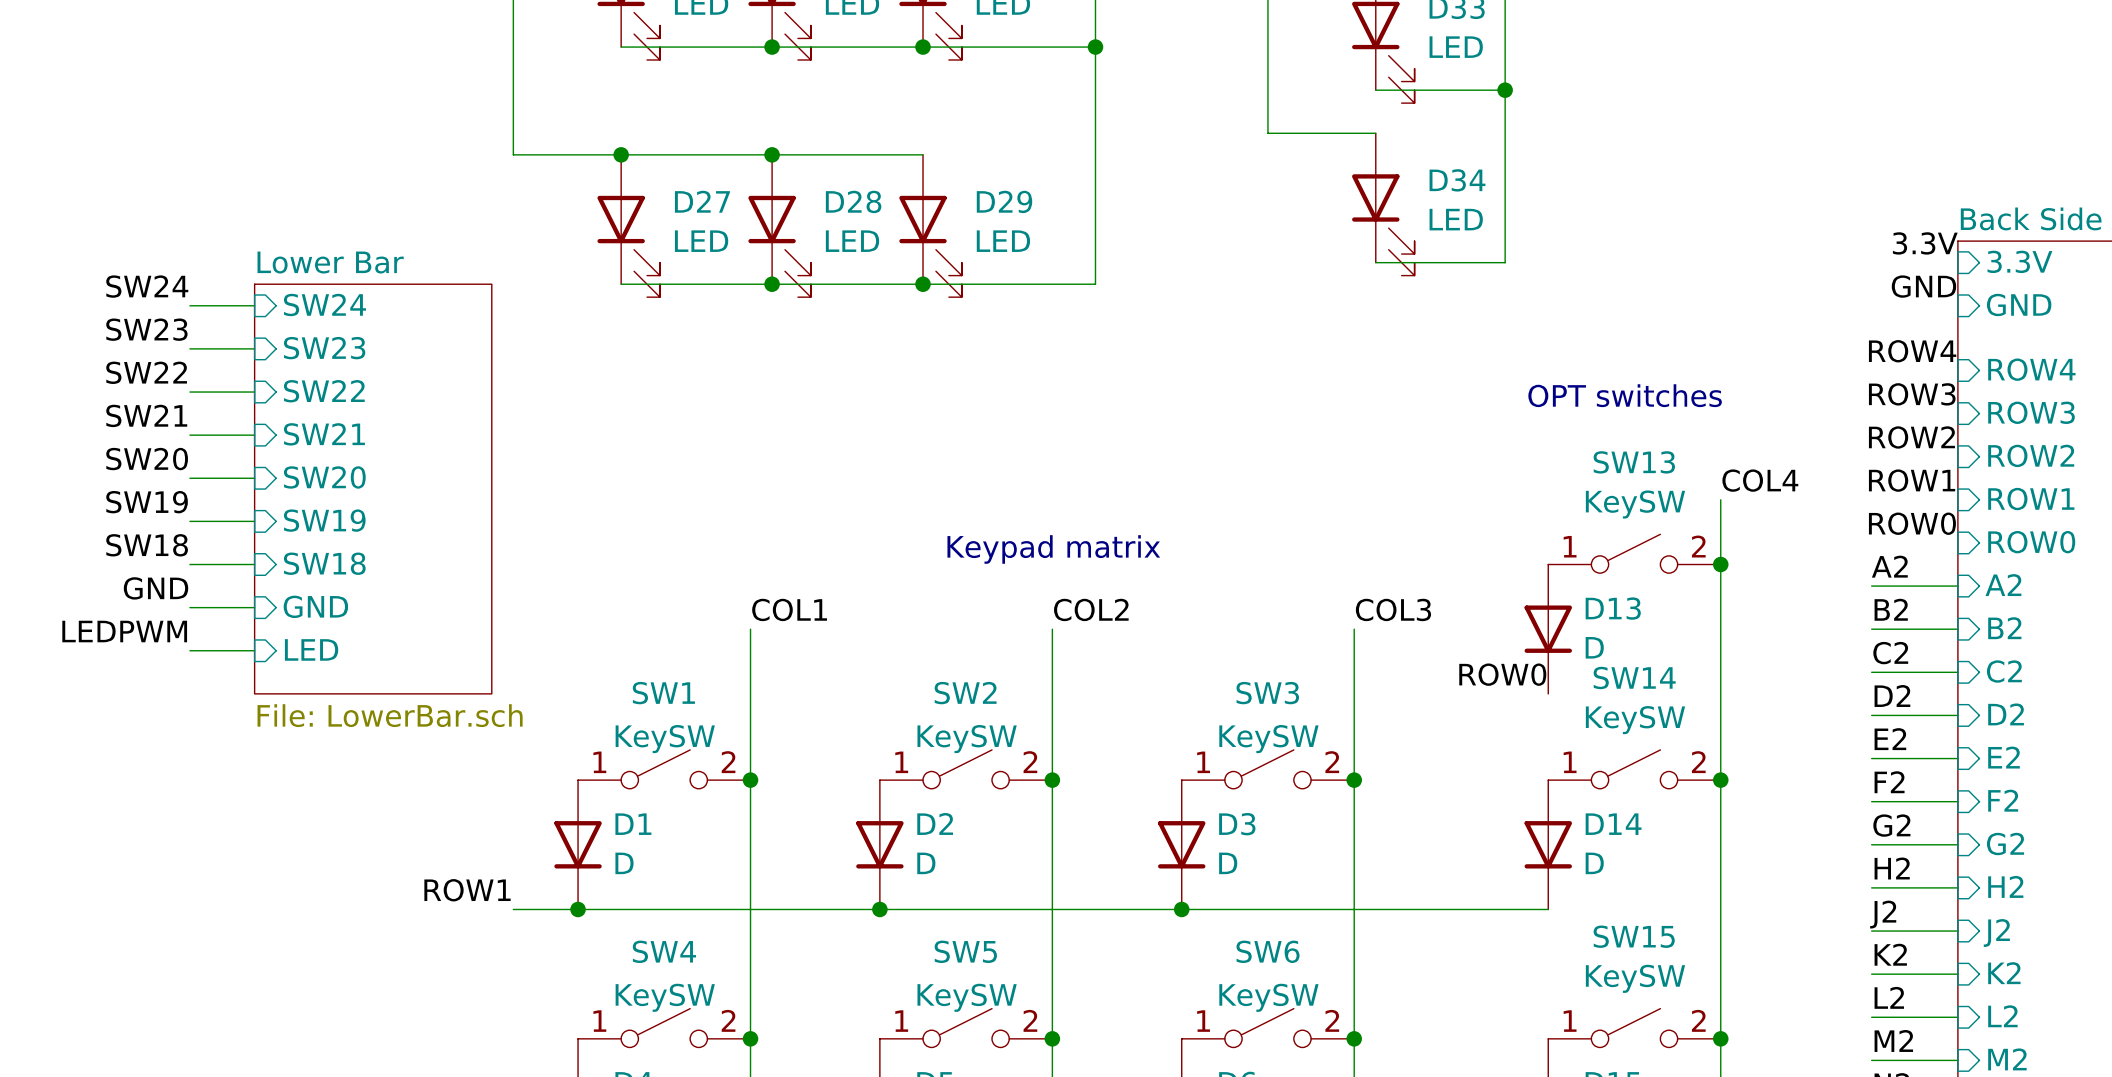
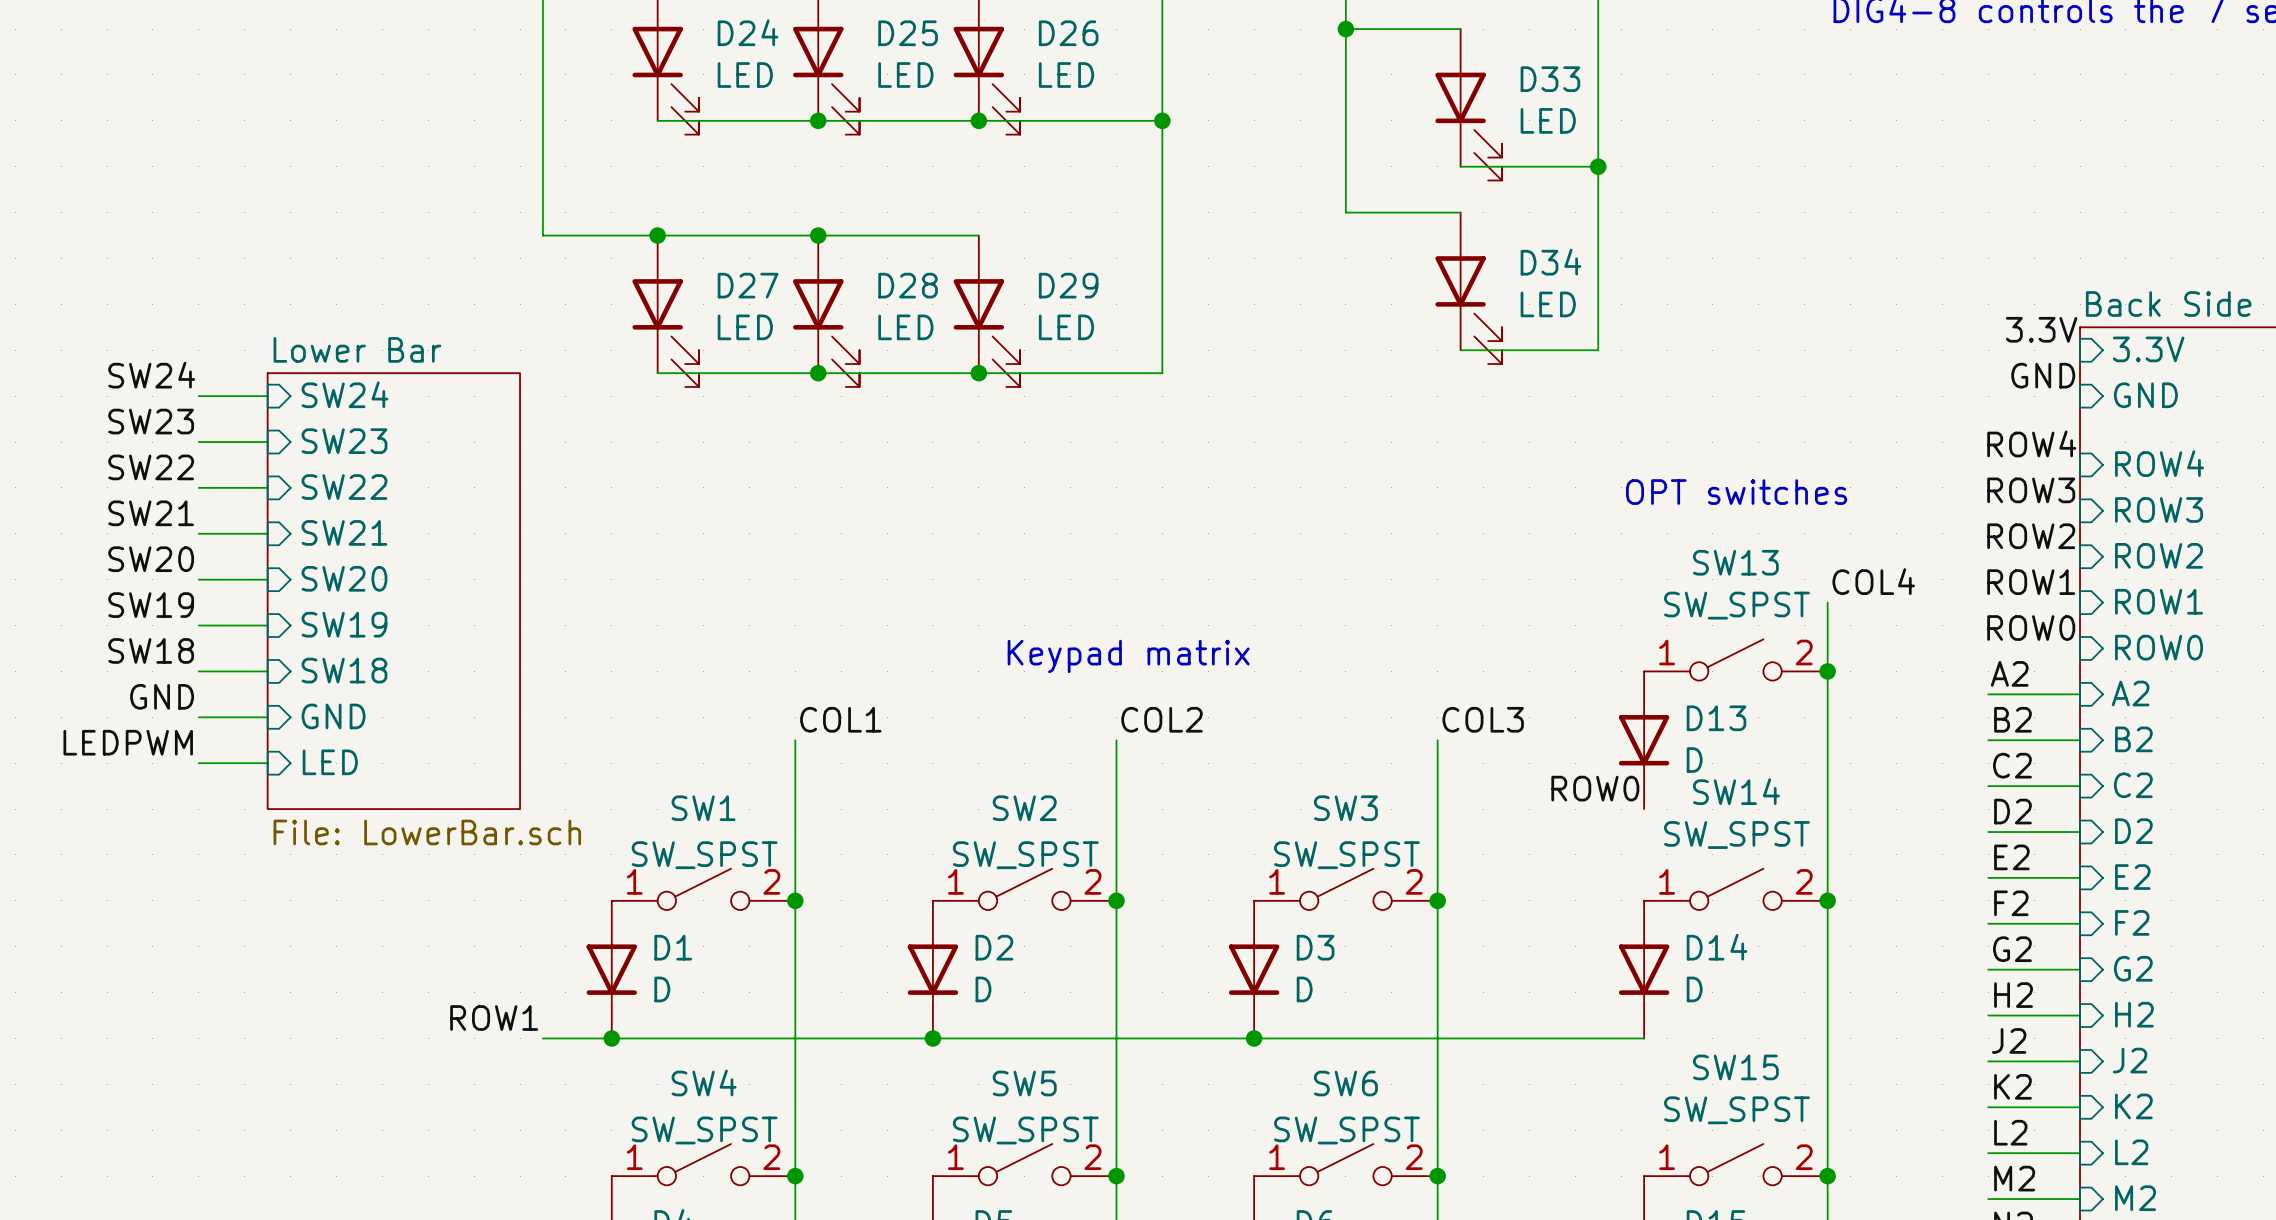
SW13 value: KeySW (1635, 504) -> SW_SPST (1736, 605)
SW14 value: KeySW (1635, 720) -> SW_SPST (1736, 835)
SW1 value: KeySW (665, 739) -> SW_SPST (704, 855)
SW2 value: KeySW (967, 739) -> SW_SPST (1025, 855)
SW3 value: KeySW (1268, 739) -> SW_SPST (1346, 855)
SW15 value: KeySW (1635, 978) -> SW_SPST (1736, 1110)
SW4 value: KeySW (665, 997) -> SW_SPST (704, 1130)
SW5 value: KeySW (967, 997) -> SW_SPST (1025, 1130)
SW6 value: KeySW (1268, 997) -> SW_SPST (1346, 1130)

